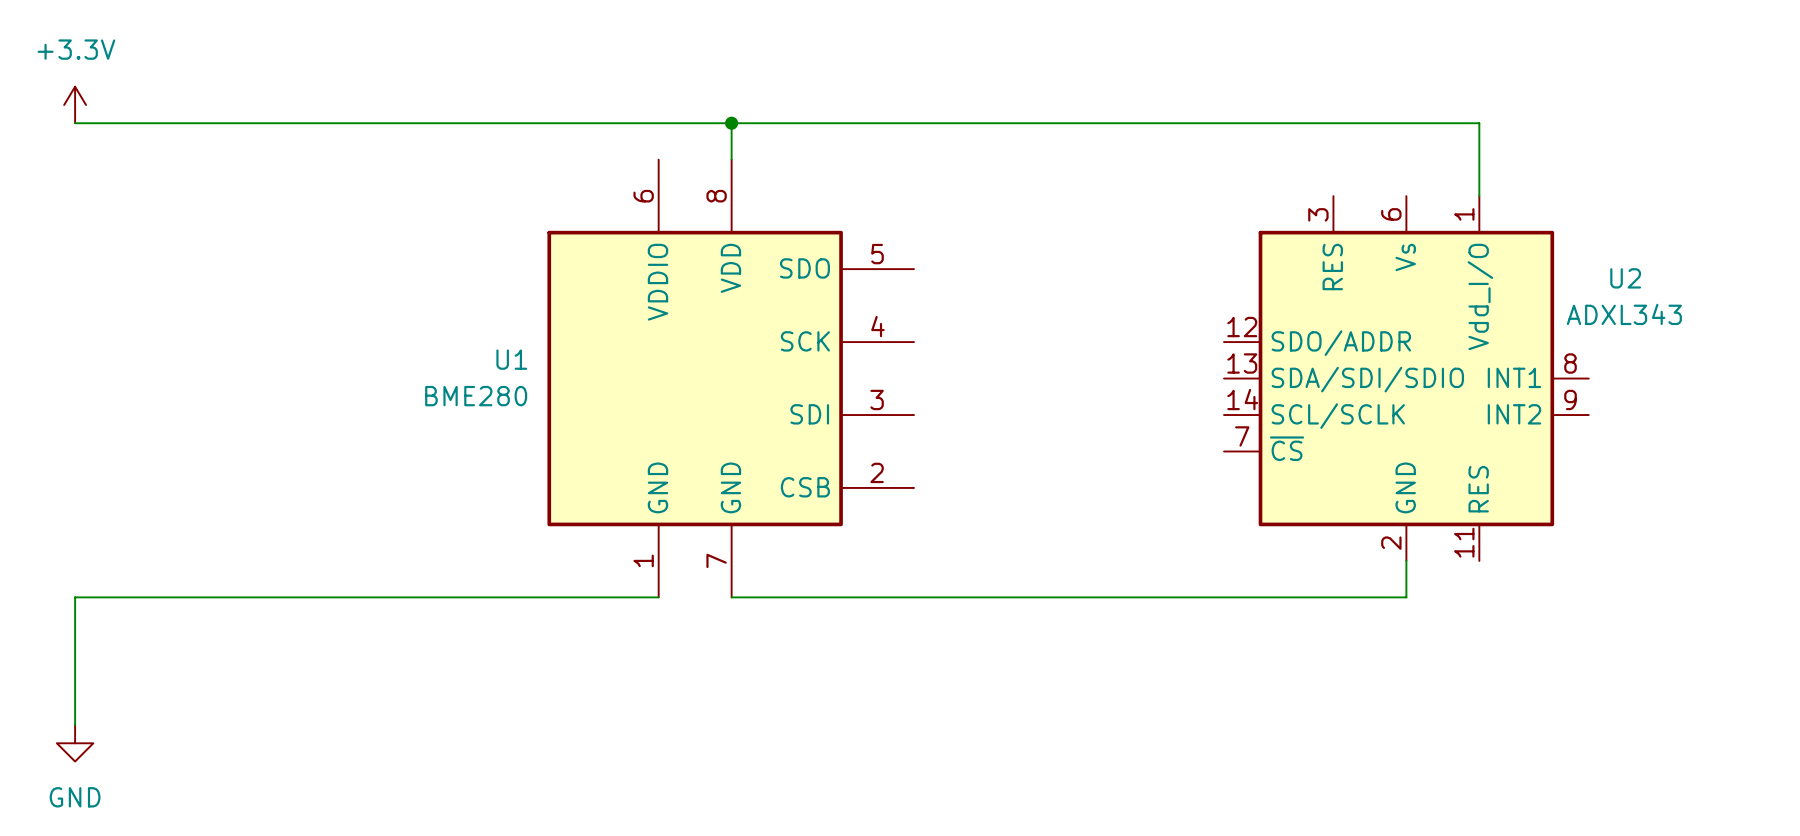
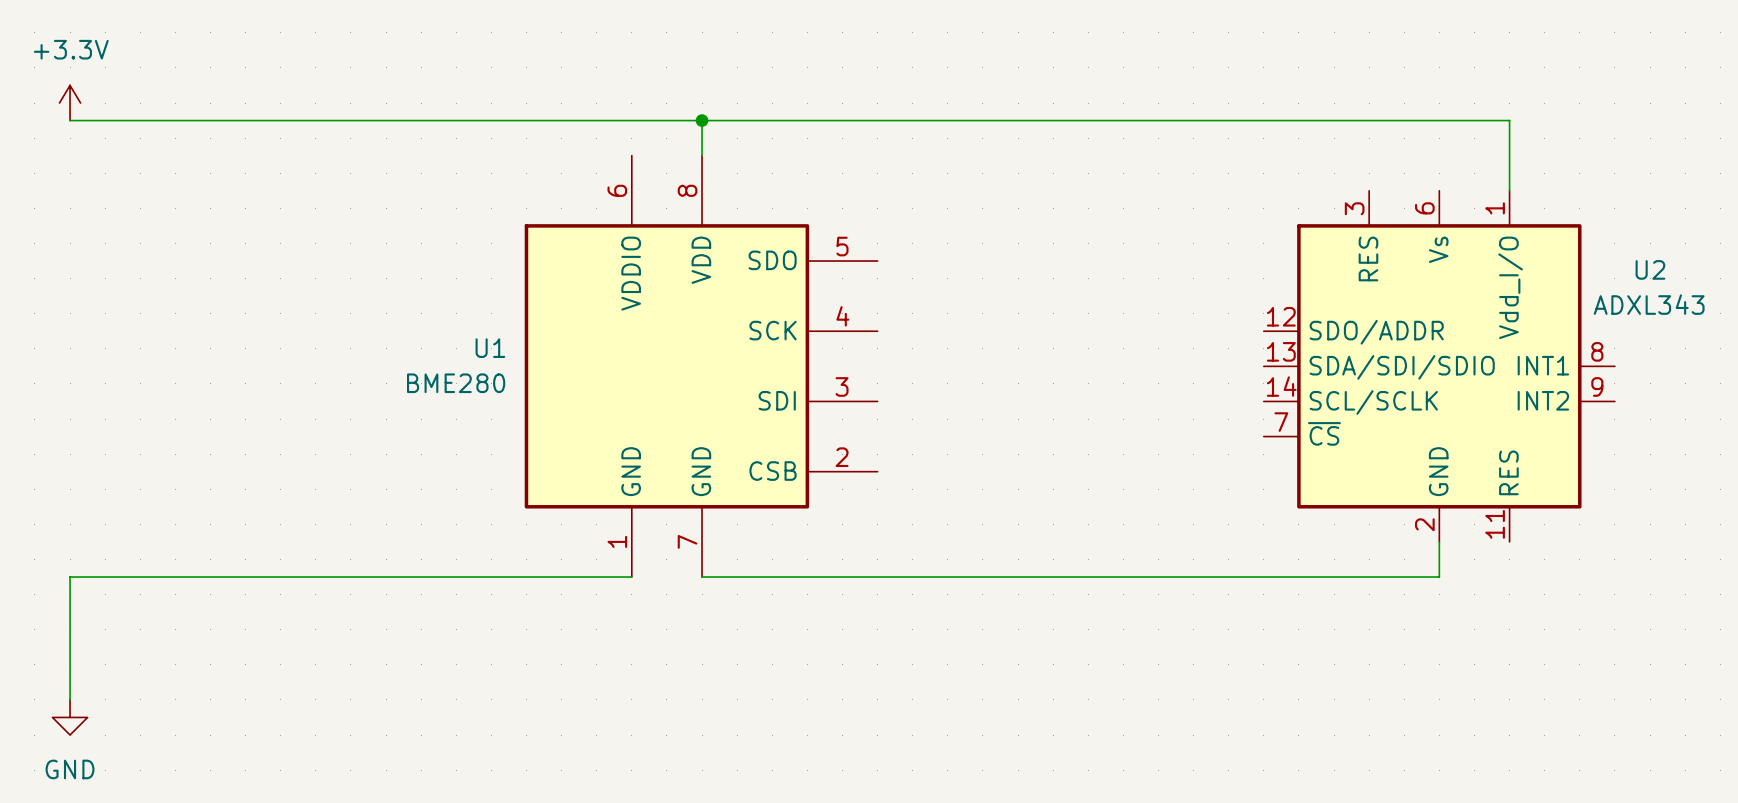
wire: (1479, 123) (1479, 196) -> (1421, 120) (1509, 120) (1509, 190)
U2 position: (1406, 378) -> (1439, 366)
wire: (1406, 560) (1406, 597) -> (1439, 541) (1439, 577) (1351, 577)

